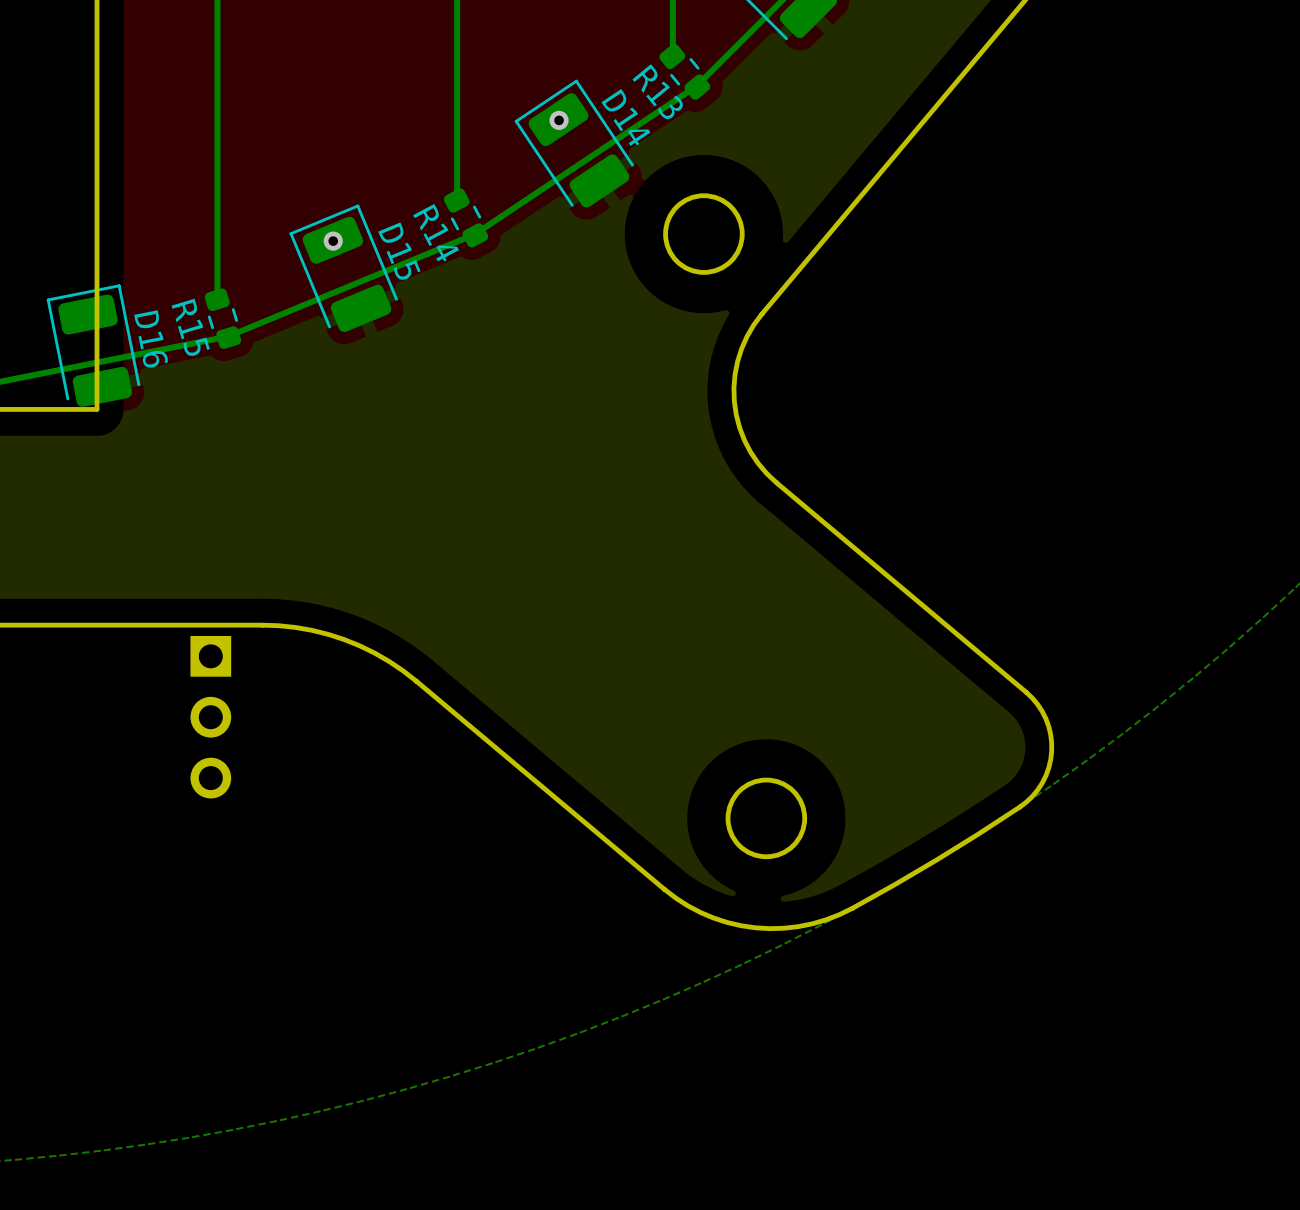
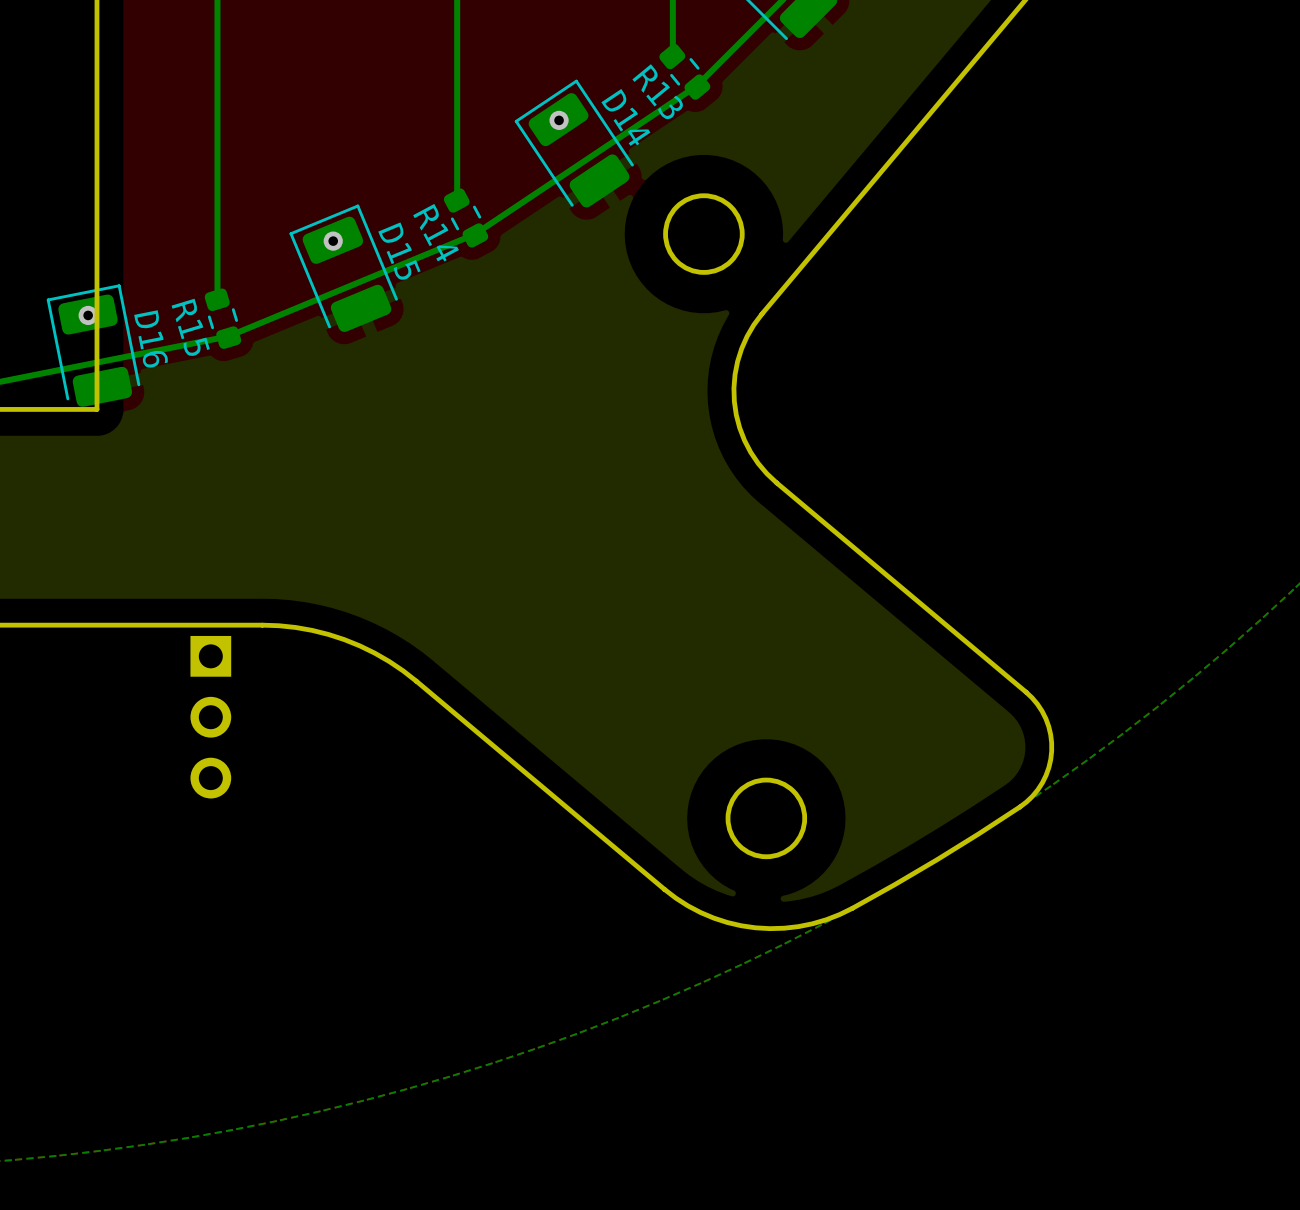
via: none -> (88, 315)

